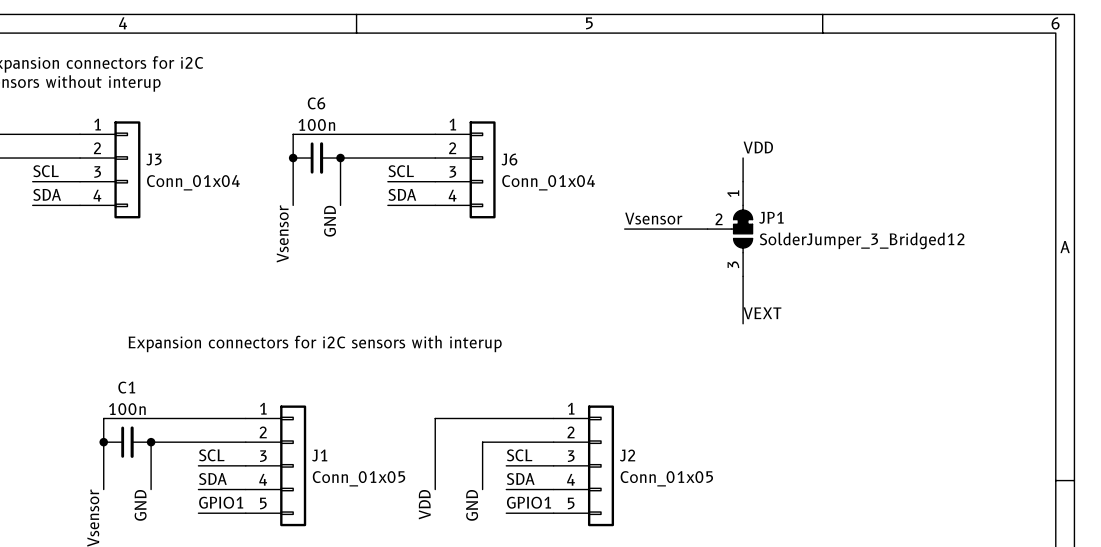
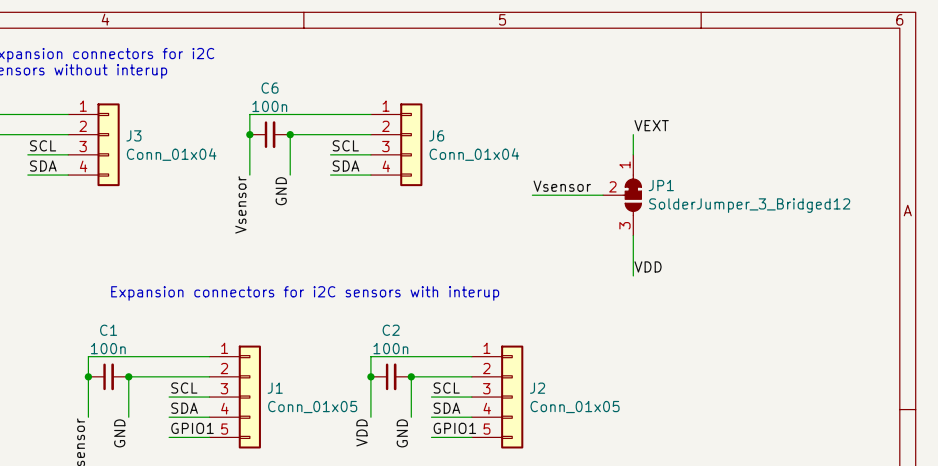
label: VDD (758, 147) -> VEXT (651, 125)
label: VEXT (762, 313) -> VDD (648, 266)
junction: none -> (370, 376)
C2: none -> 100n (391, 376)
junction: none -> (411, 376)

